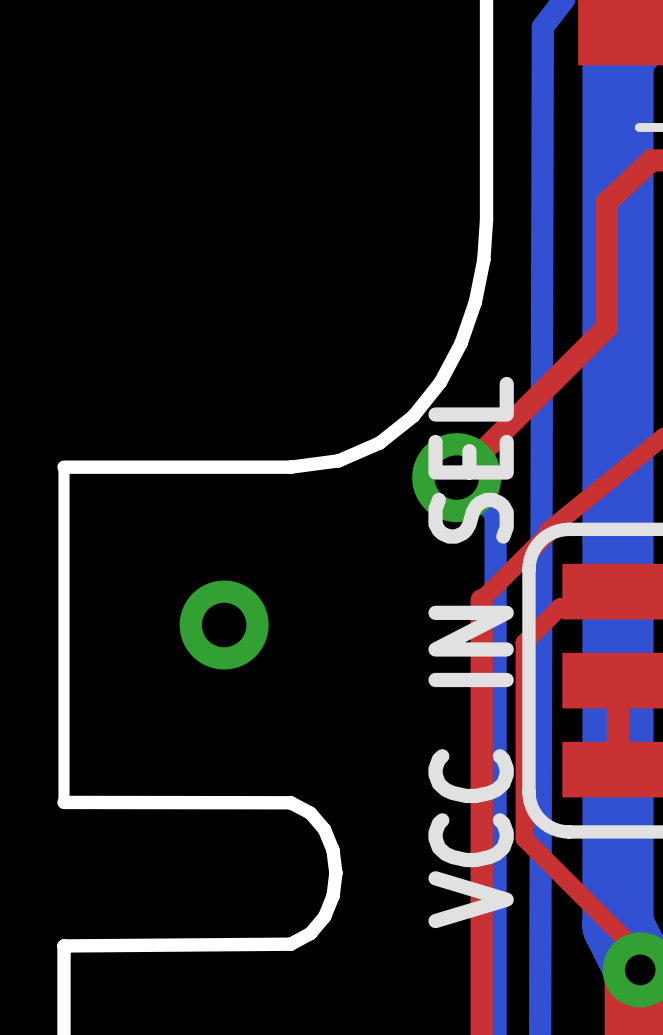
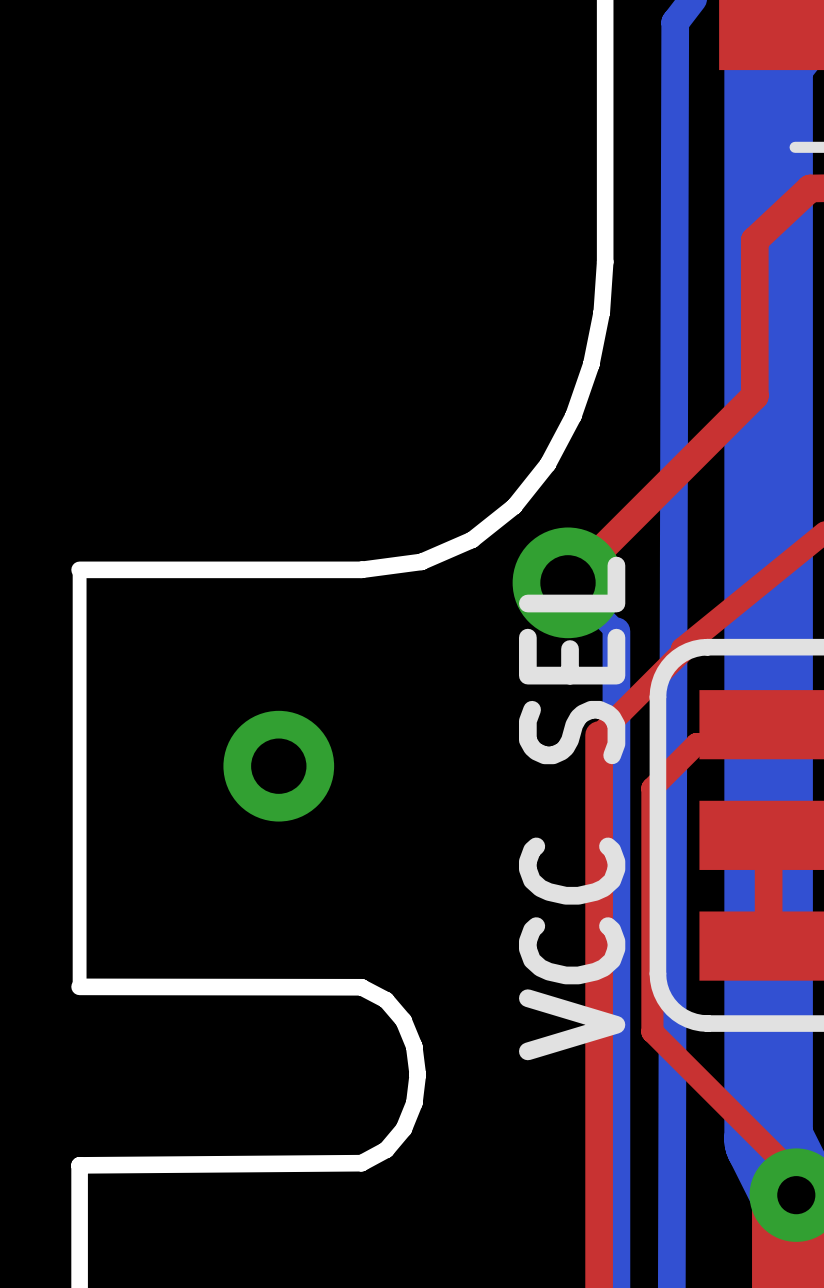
text: VCC IN SEL (471, 652) -> VCC SEL (572, 808)

